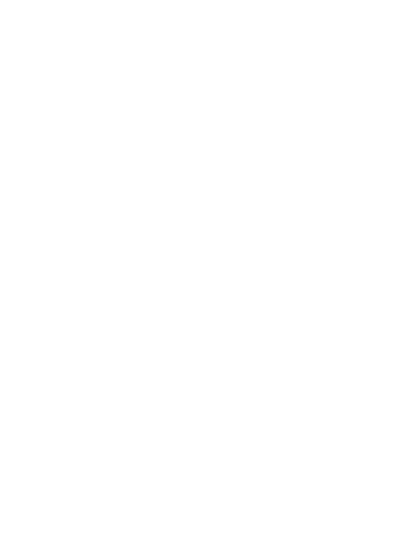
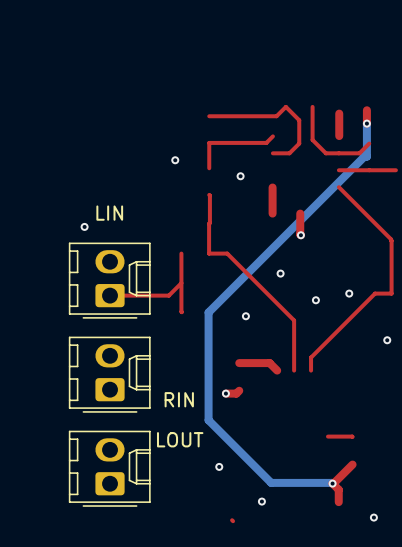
top track: none -> (312, 106) (312, 139) (325, 153) (359, 153) (369, 143)
top track: none -> (366, 110) (366, 123)
top track: none -> (339, 113) (338, 136)
top track: none -> (209, 116) (276, 116) (285, 106) (299, 120) (299, 143) (289, 153) (272, 153)
bottom track: none -> (366, 123) (366, 156) (364, 156) (208, 312) (208, 420) (271, 482) (332, 483)
via: none -> (366, 123)
top track: none -> (272, 136) (266, 142) (209, 142) (209, 168)
via: none -> (175, 160)
top track: none -> (338, 170) (395, 170)
via: none -> (240, 176)
top track: none -> (272, 187) (272, 213)
top track: none -> (338, 187) (391, 239) (391, 293) (375, 293) (311, 357) (311, 370)
top track: none -> (209, 194) (209, 253) (227, 253) (294, 320) (294, 370)
top track: none -> (300, 213) (300, 235)
via: none -> (84, 226)
via: none -> (300, 235)
top track: none -> (181, 253) (181, 312)
via: none -> (280, 273)
LIN: none -> (109, 280)
top track: none -> (181, 283) (168, 295) (110, 295)
via: none -> (349, 293)
via: none -> (315, 300)
via: none -> (245, 316)
via: none -> (387, 340)
top track: none -> (239, 363) (269, 363) (277, 370)
RIN: none -> (109, 374)
top track: none -> (239, 390) (236, 393) (225, 393)
via: none -> (225, 393)
top track: none -> (327, 436) (352, 436)
top track: none -> (352, 464) (332, 483) (338, 489) (338, 502)
via: none -> (219, 466)
LOUT: none -> (109, 468)
via: none -> (332, 483)
via: none -> (261, 501)
via: none -> (373, 517)
top track: none -> (232, 520) (233, 521)

